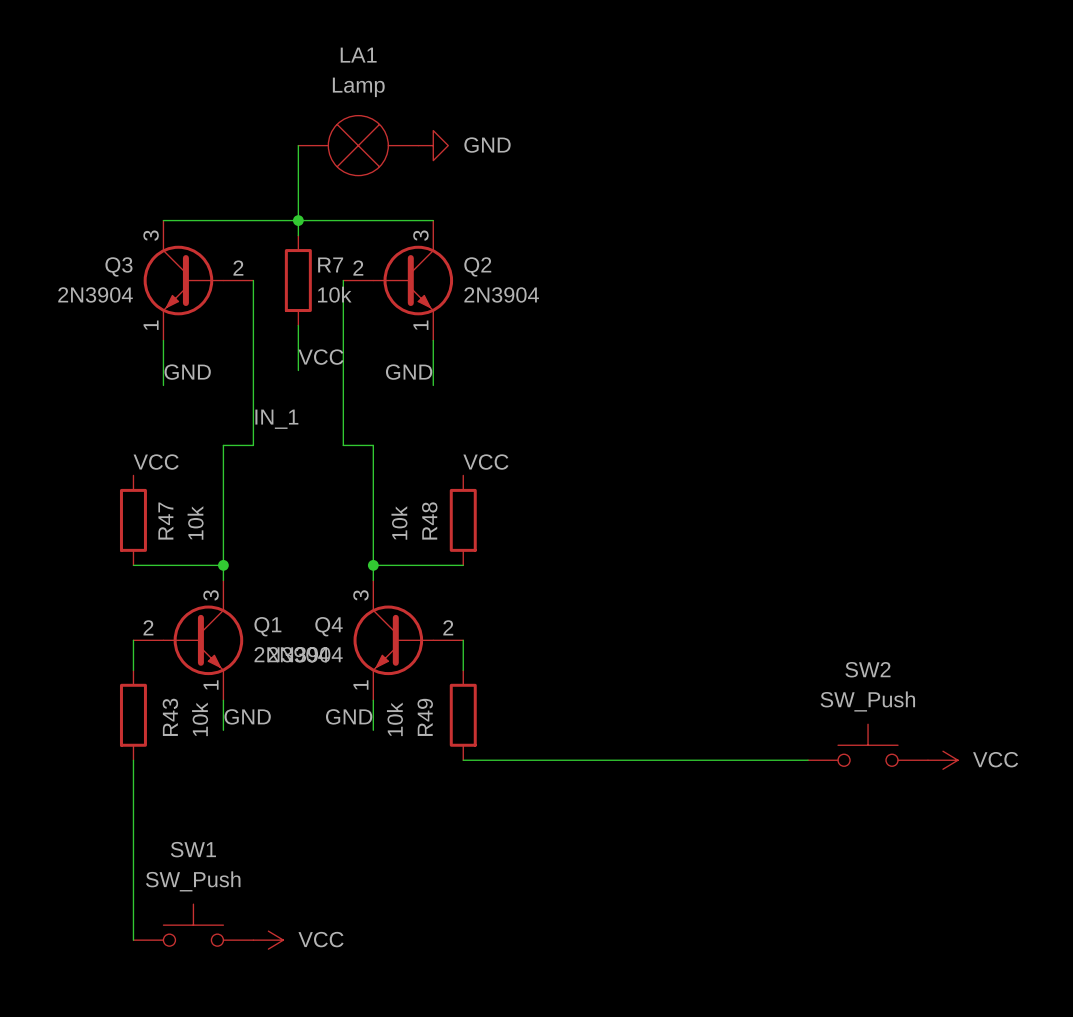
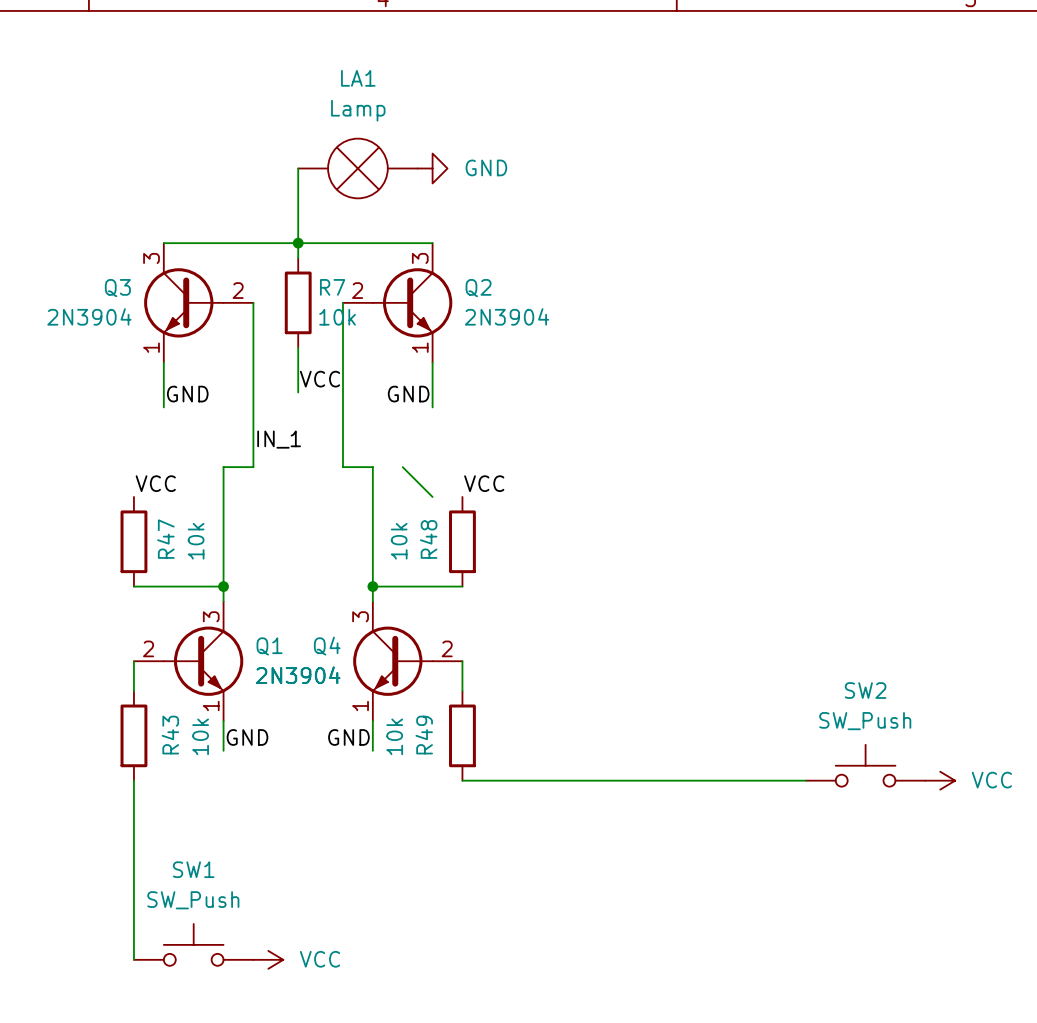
wire: none -> (402, 467) (432, 496)

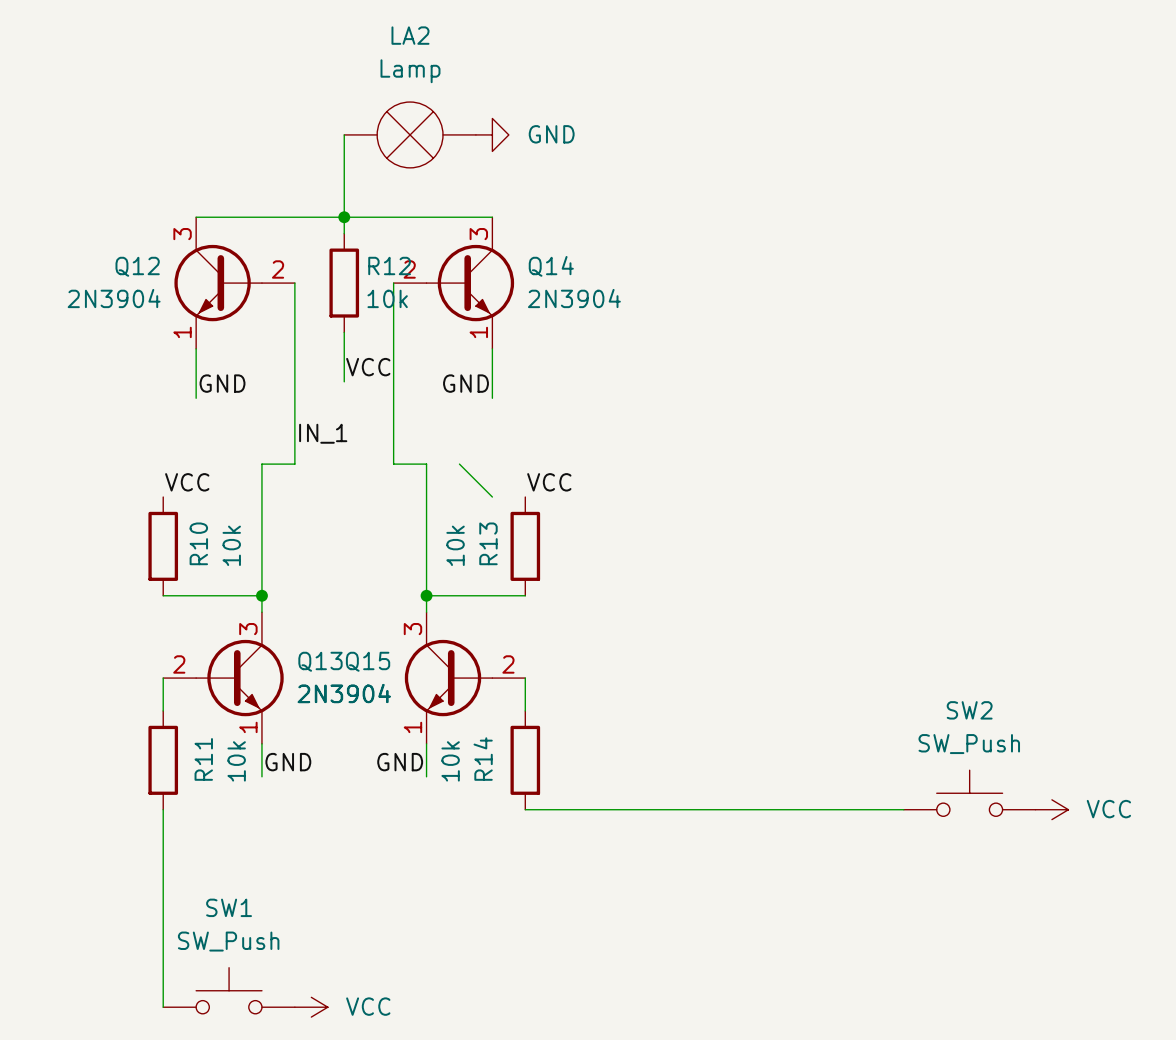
LA1 name: LA1 (358, 78) -> LA2 (410, 35)
R7 name: R7 (332, 287) -> R12 (389, 265)
Q3 name: Q3 (117, 288) -> Q12 (137, 266)
Q2 name: Q2 (478, 288) -> Q14 (551, 266)
R47 name: R47 (165, 539) -> R10 (198, 543)
R48 name: R48 (428, 539) -> R13 (488, 543)
Q1 name: Q1 (269, 646) -> Q13 (320, 661)
Q4 name: Q4 (327, 646) -> Q15 (368, 661)
R43 name: R43 (170, 735) -> R11 (203, 759)
R49 name: R49 (424, 735) -> R14 (483, 759)

